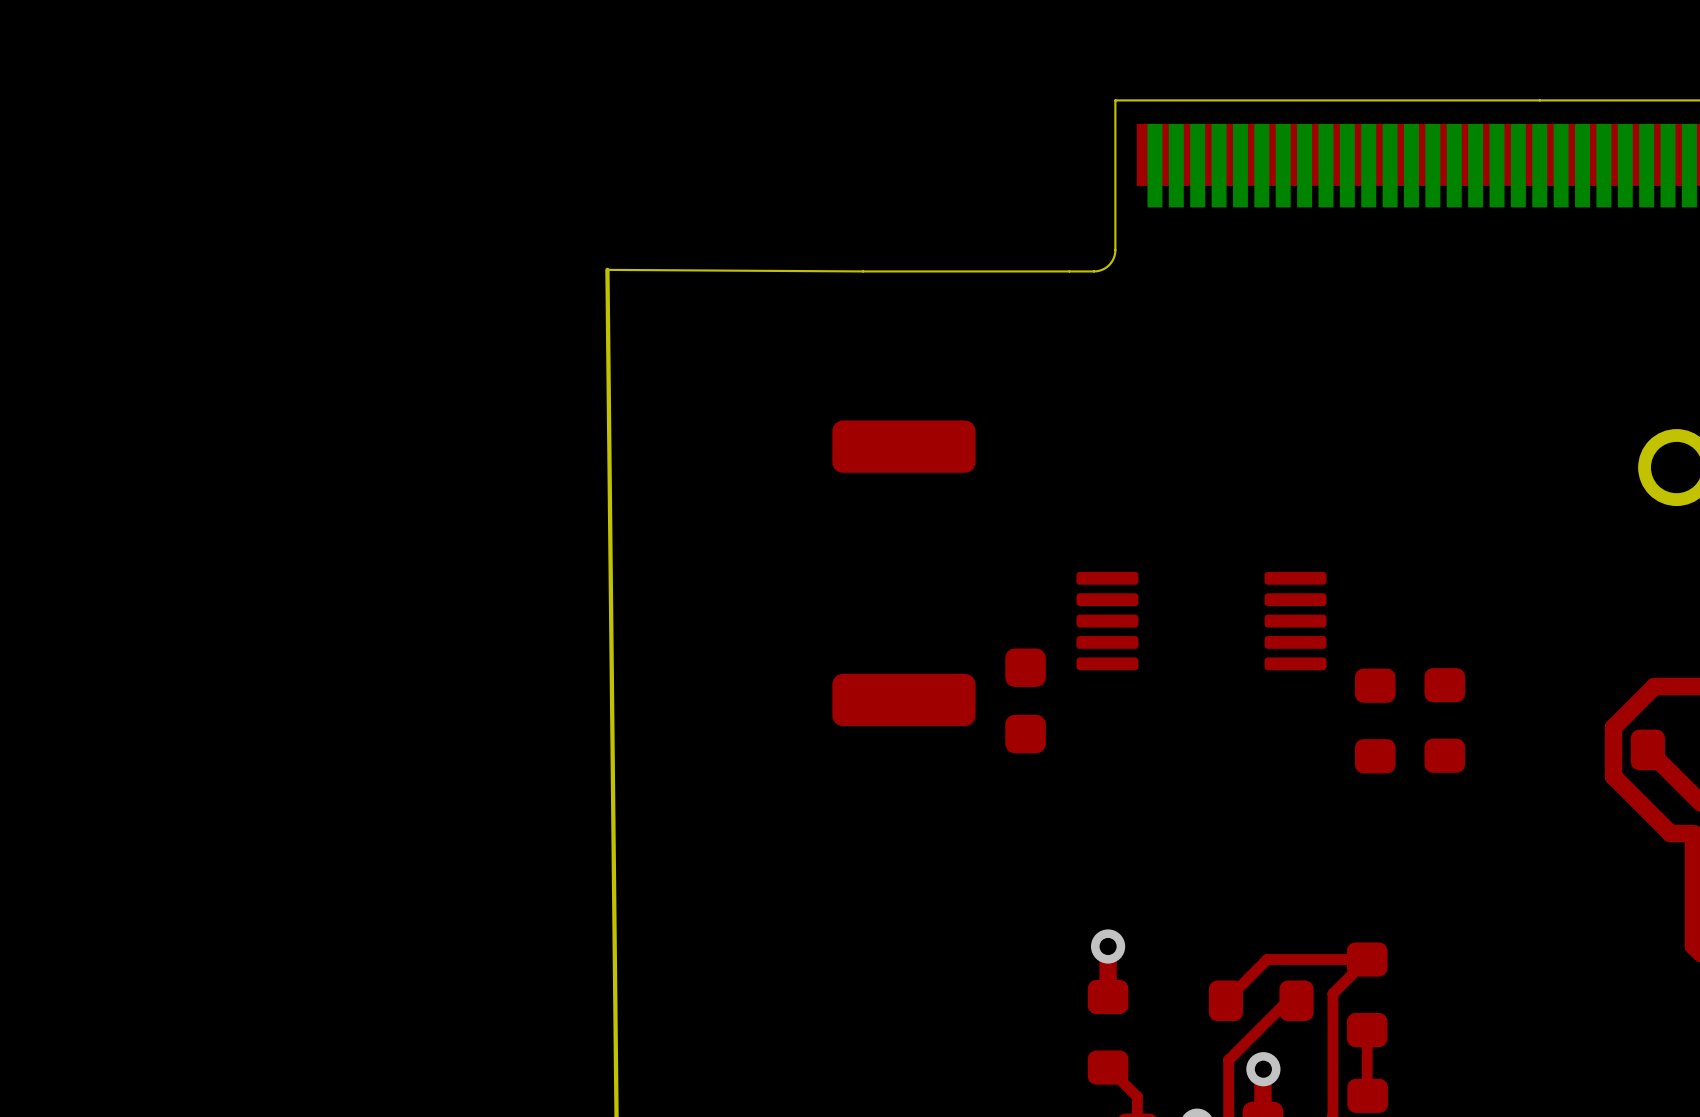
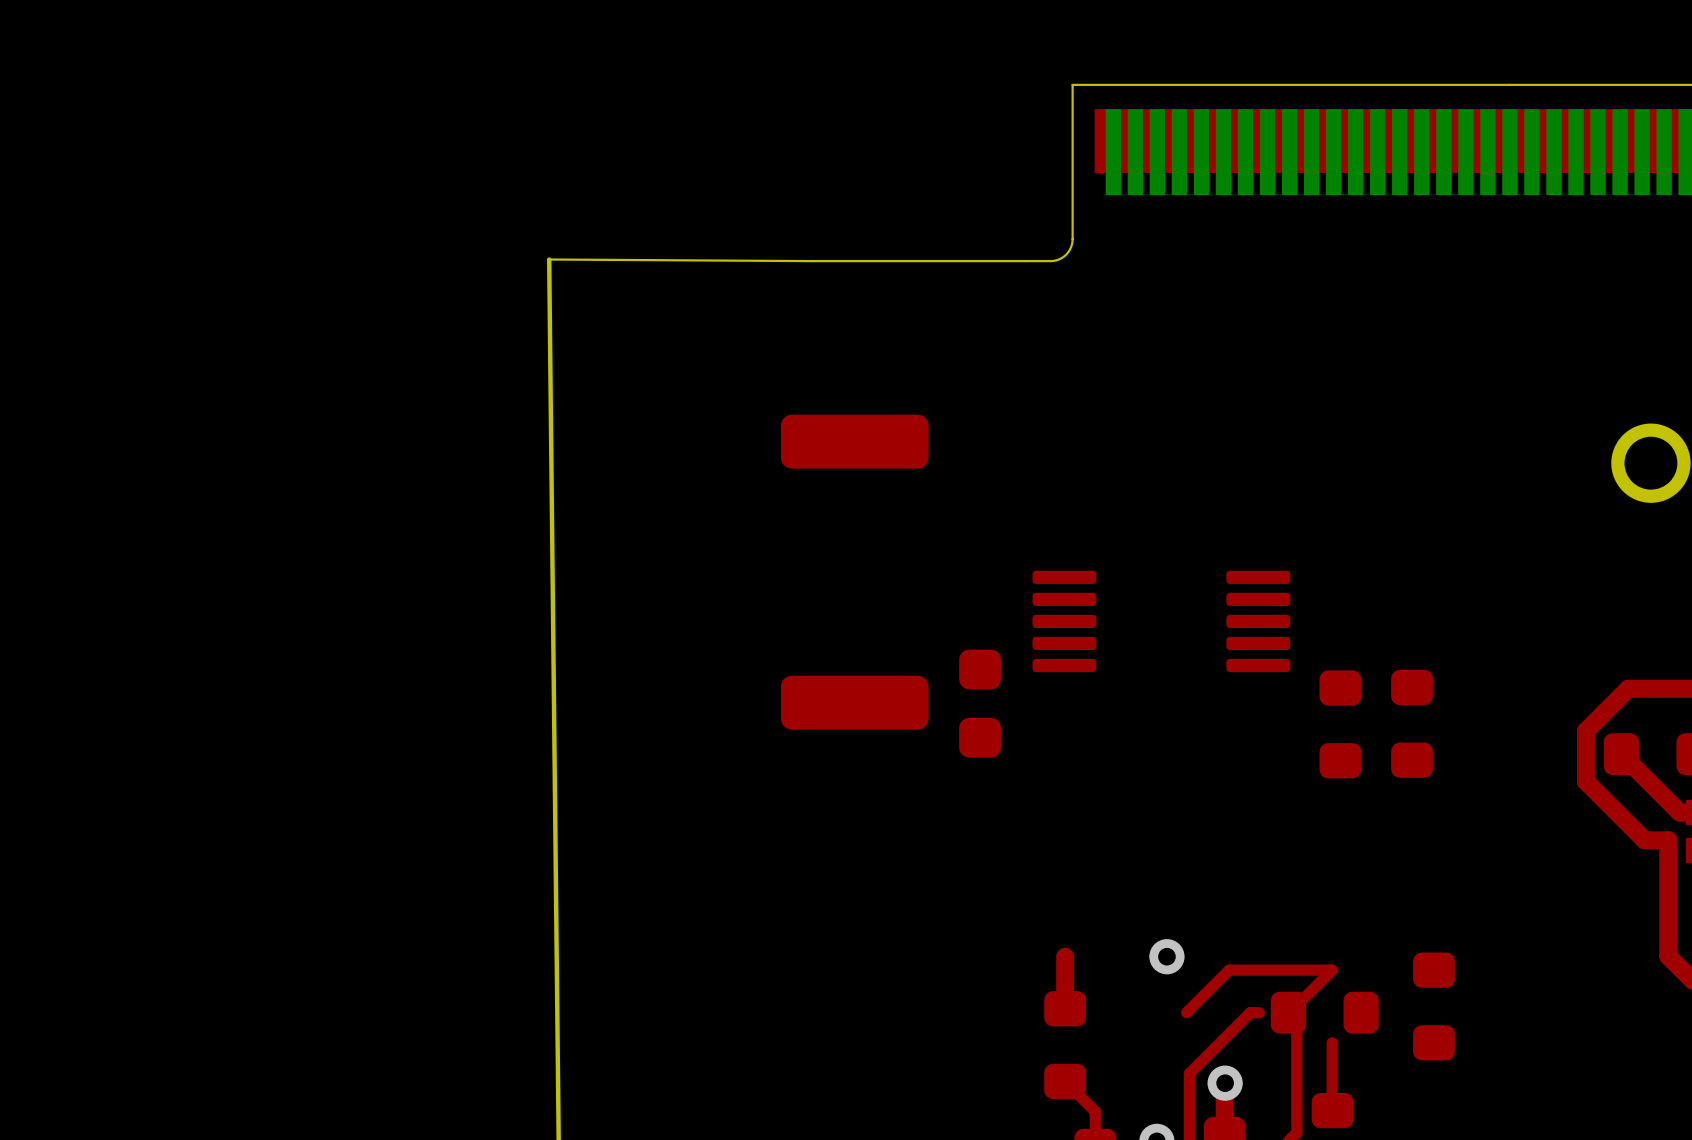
via position: (1108, 946) -> (1166, 956)
part rotation: 0° (1367, 994) -> 90° clockwise (1324, 1012)
part rotation: 0° (1261, 1000) -> 90° clockwise (1433, 1006)
part position: (1261, 1000) -> (1433, 1006)

